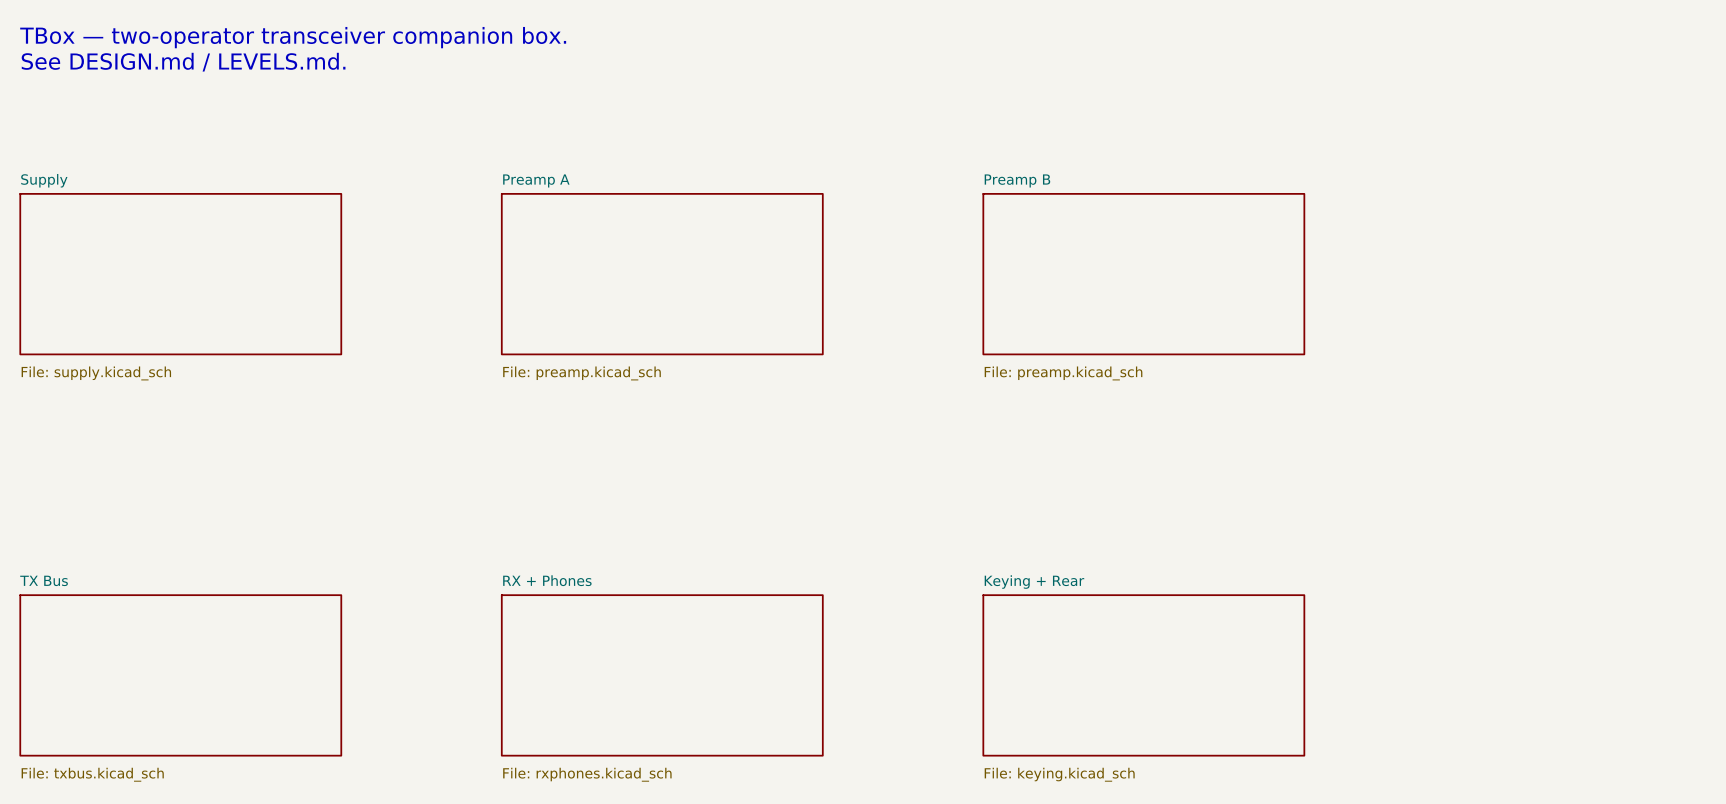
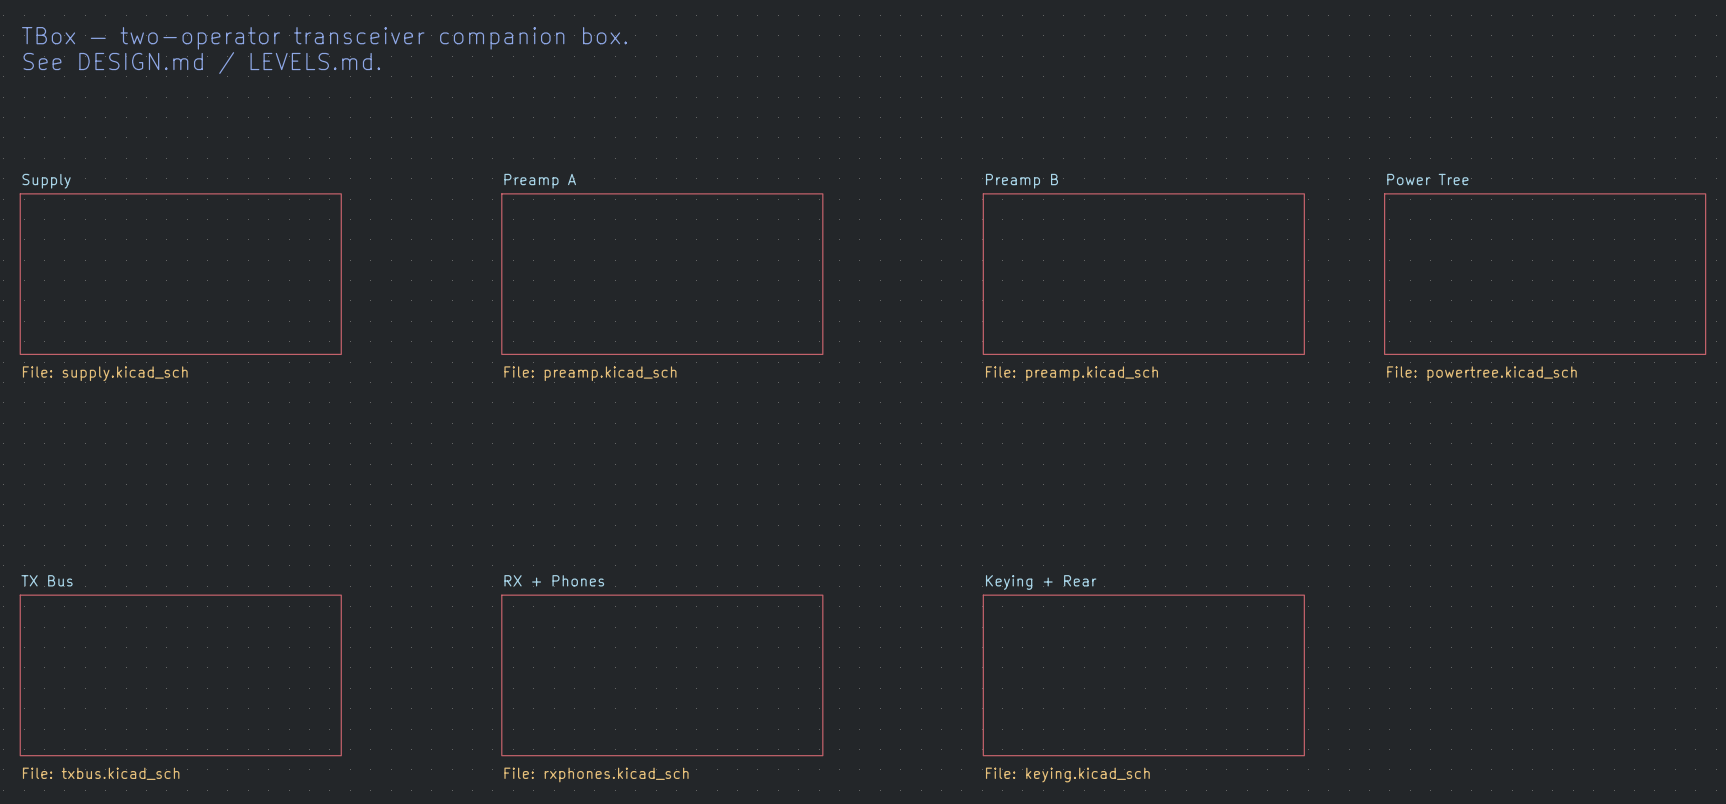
sheet Power Tree: none -> File: powertree.kicad_sch (1545, 274)

